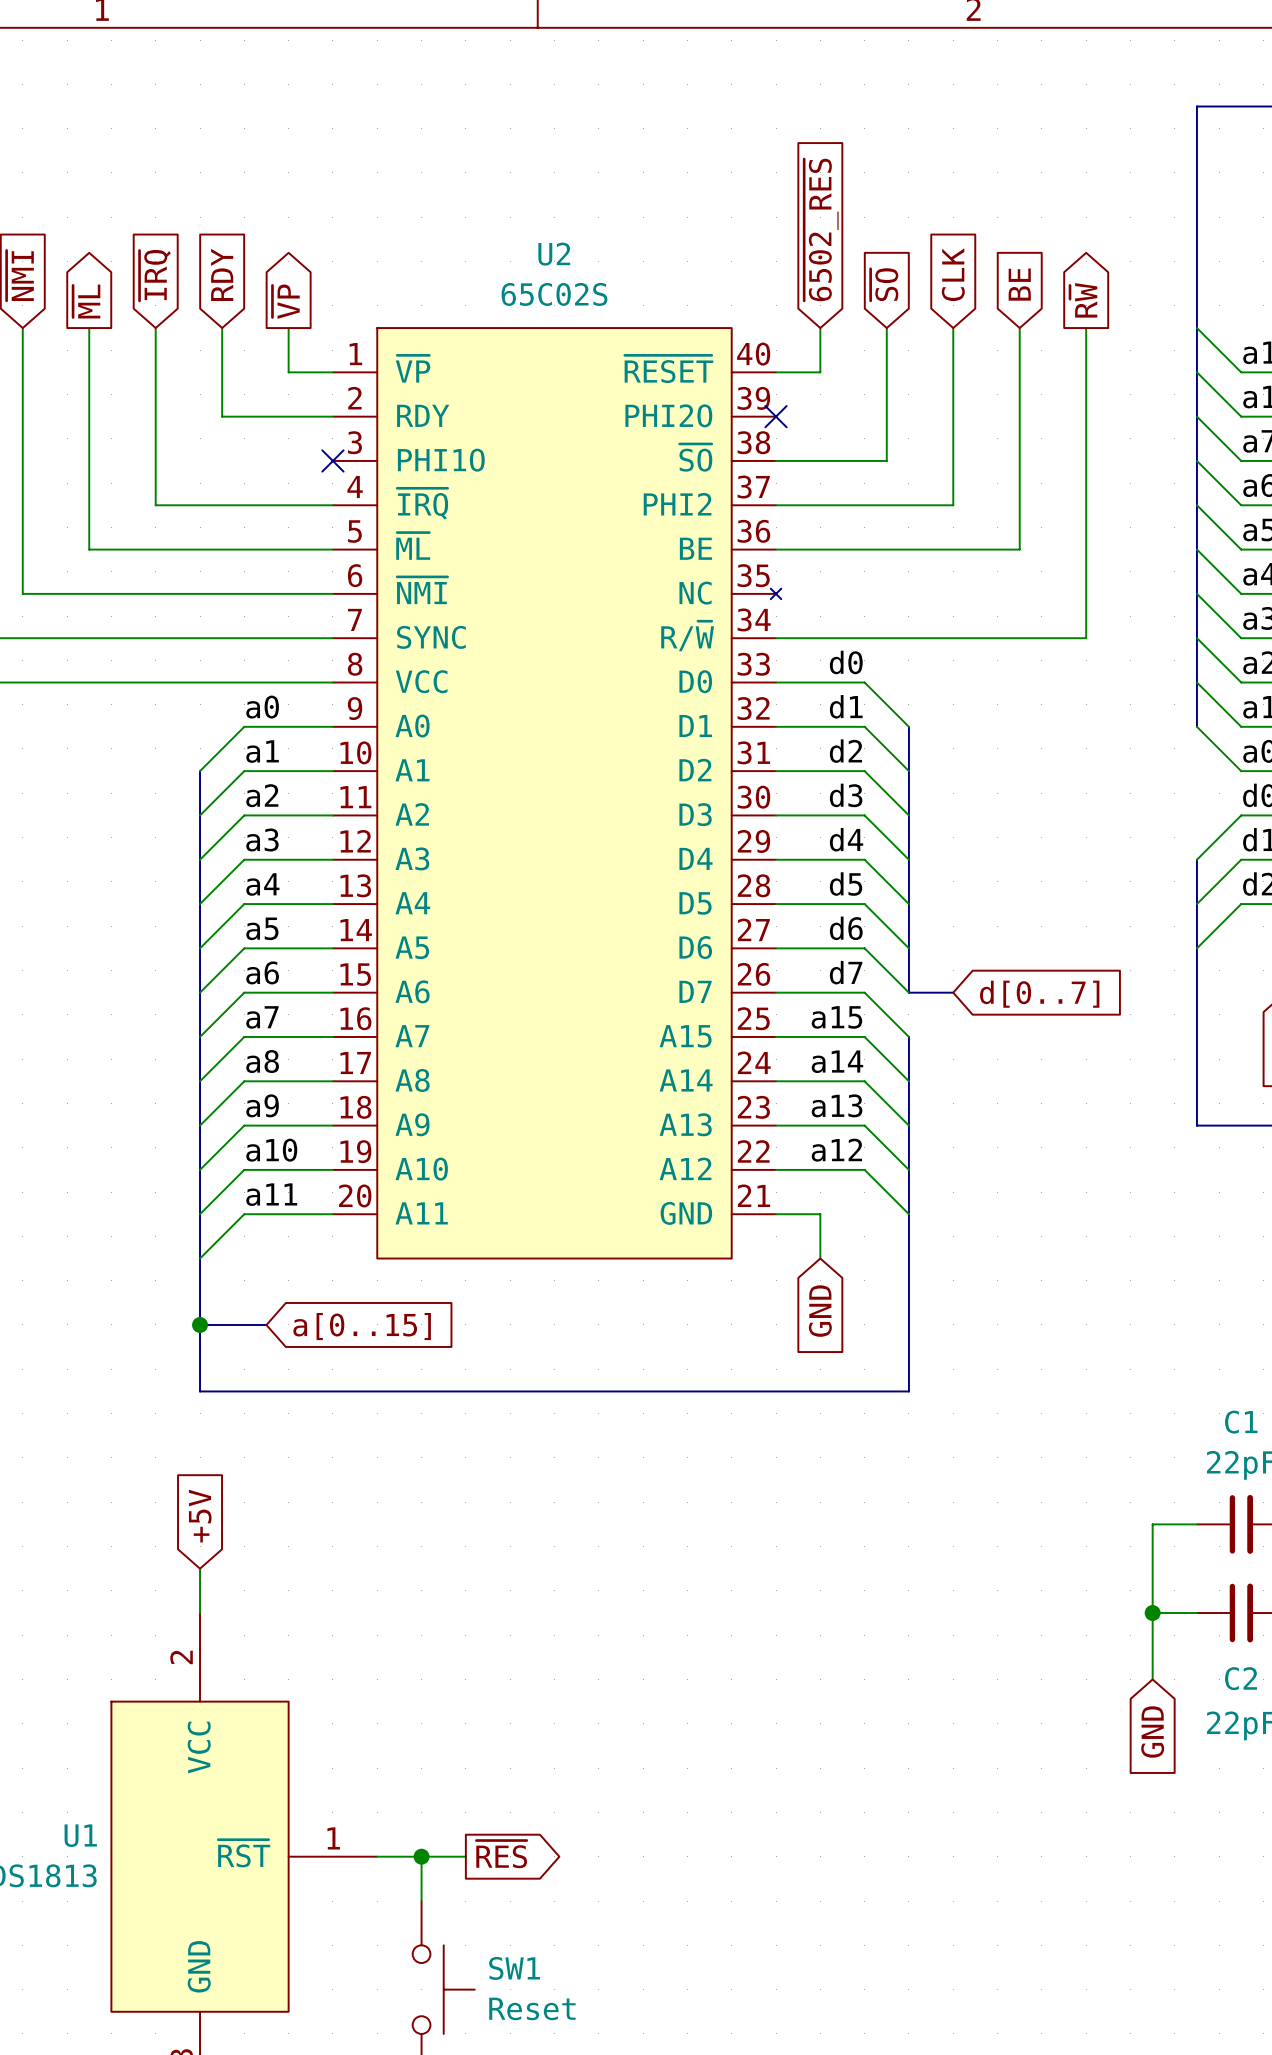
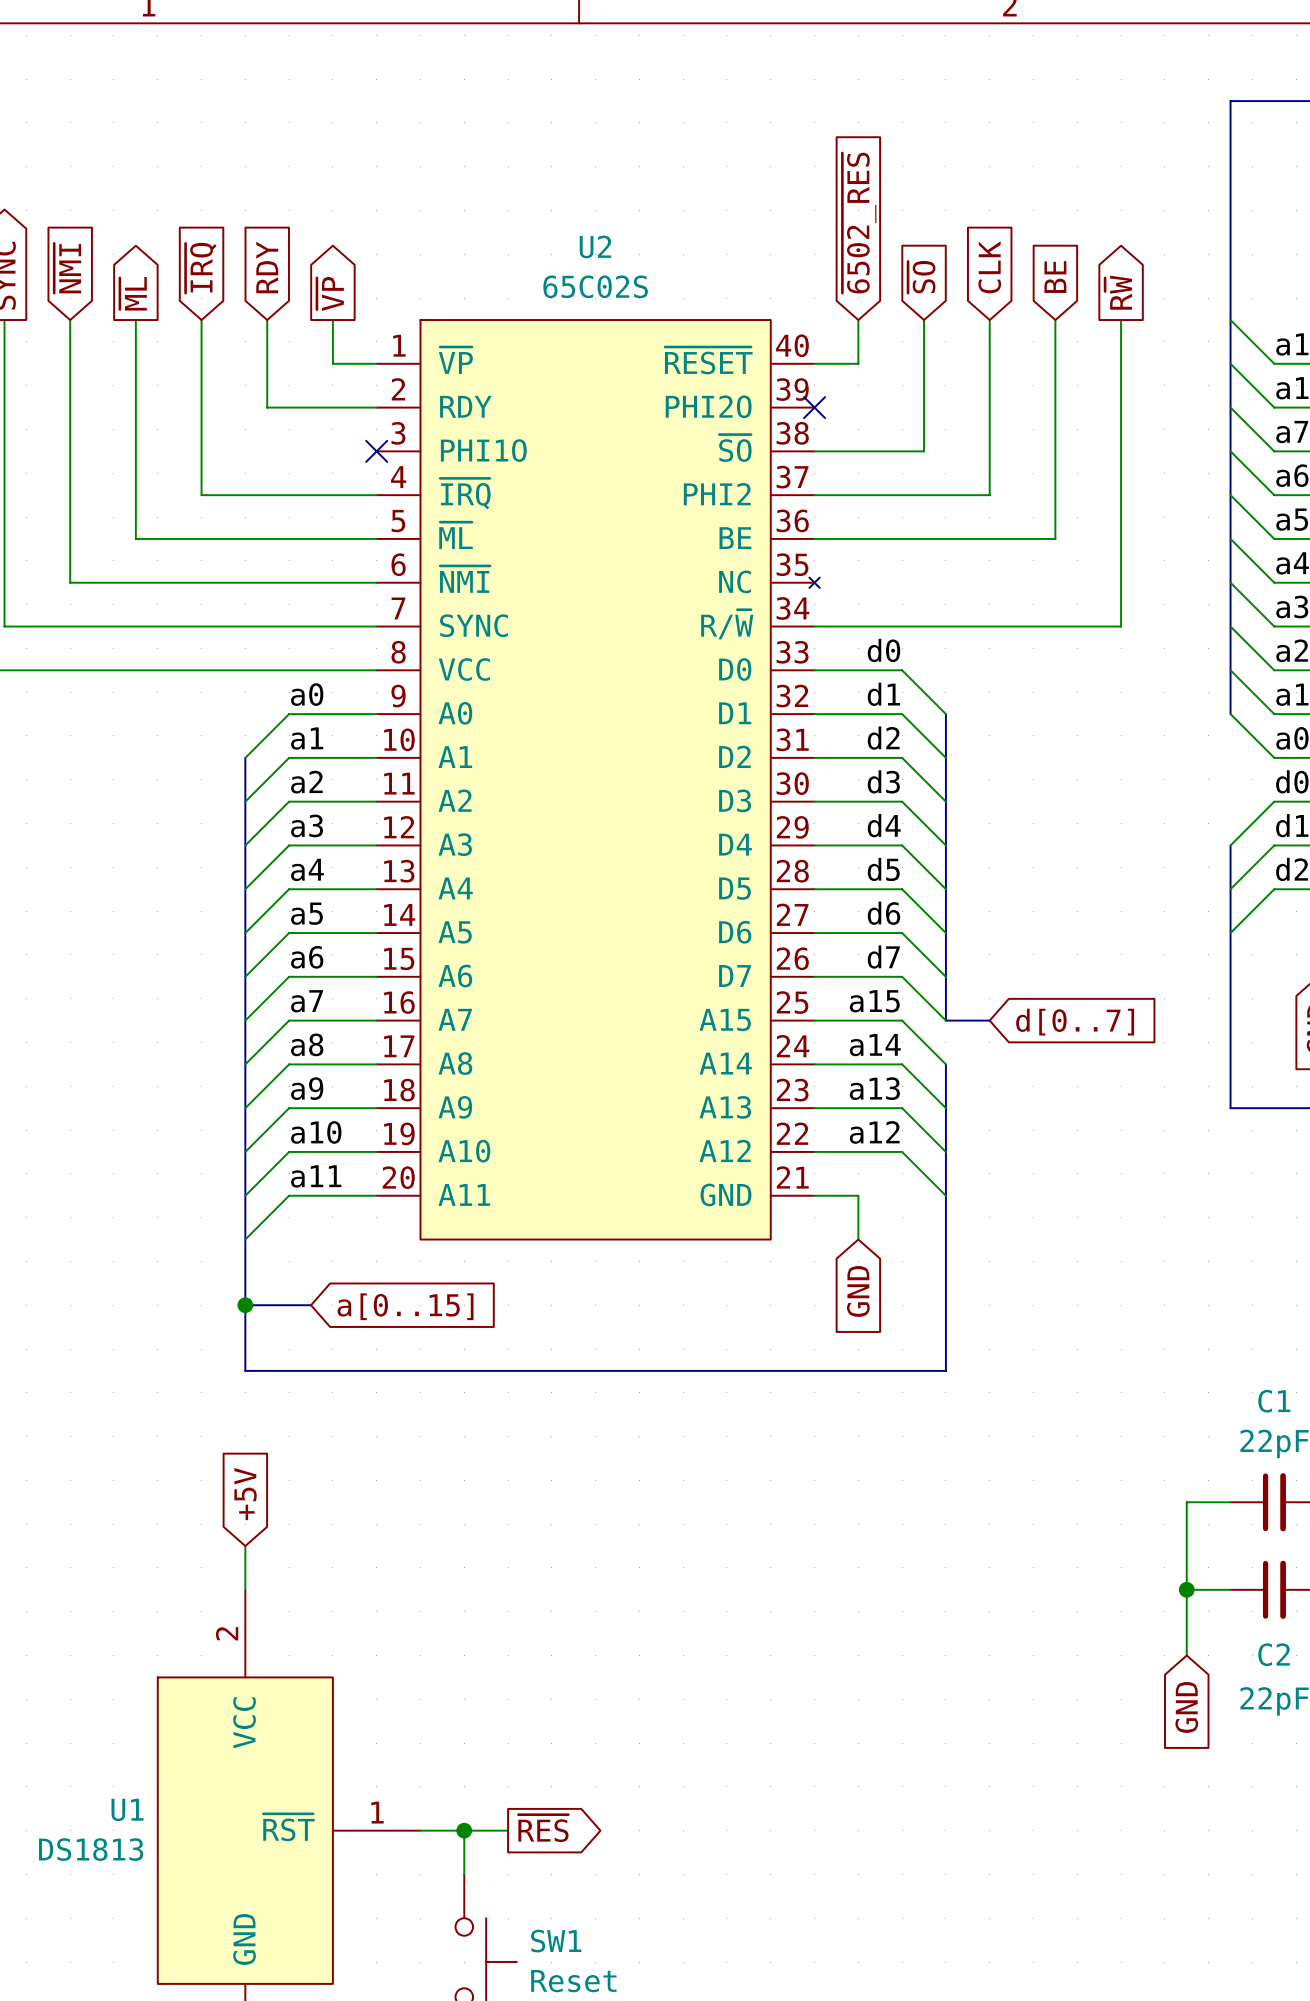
bus: (908, 992) (953, 992) -> (945, 976) (945, 1020) (989, 1020)
global label position: d[0..7] (1039, 994) -> d[0..7] (1075, 1022)
bus: (908, 1036) (908, 1081) -> none

